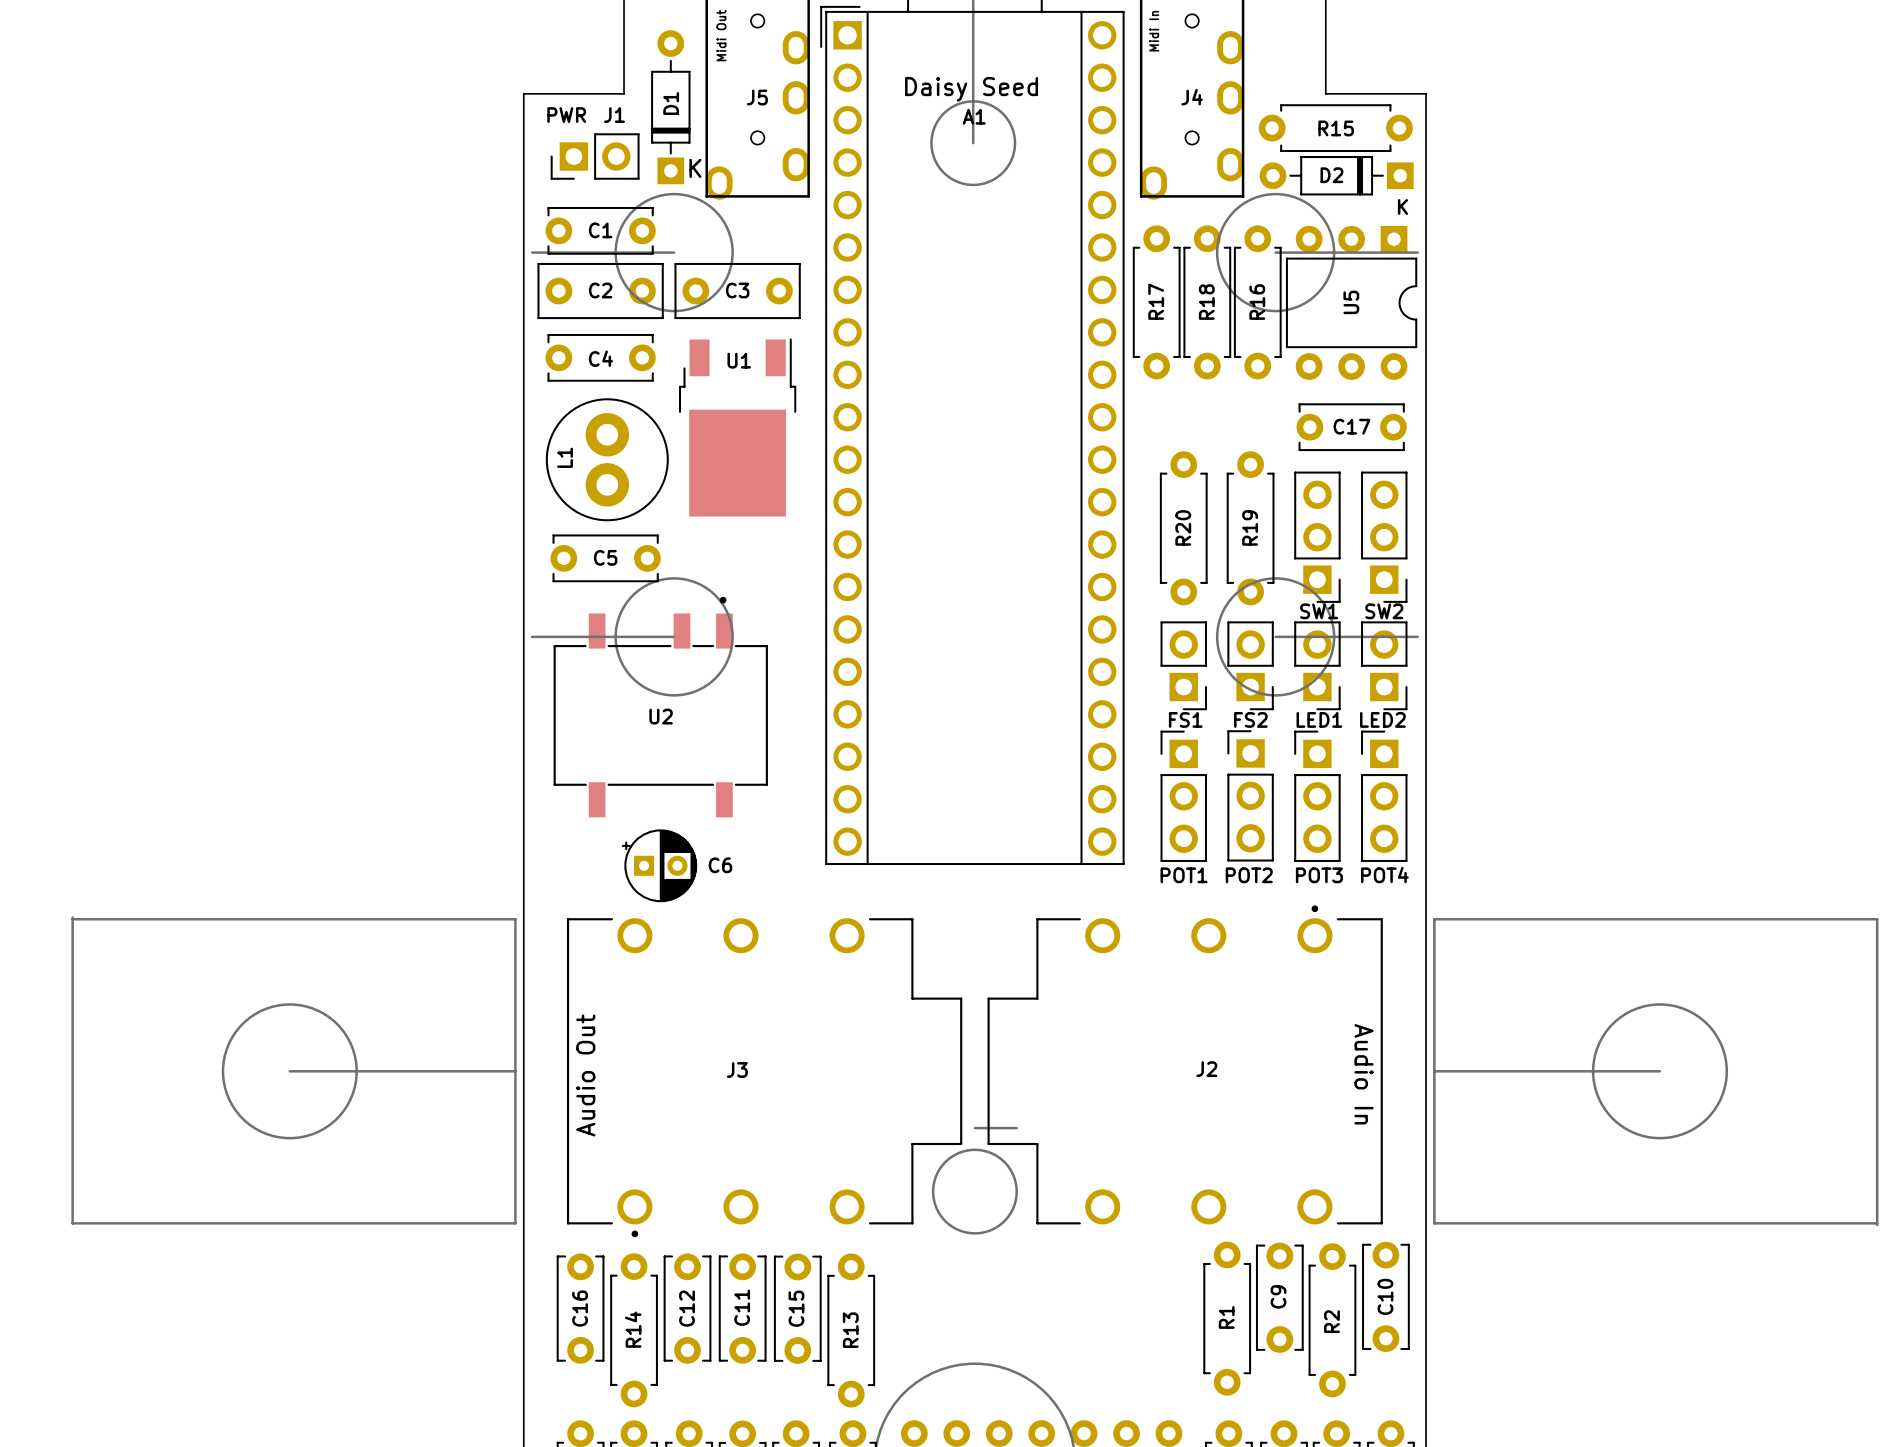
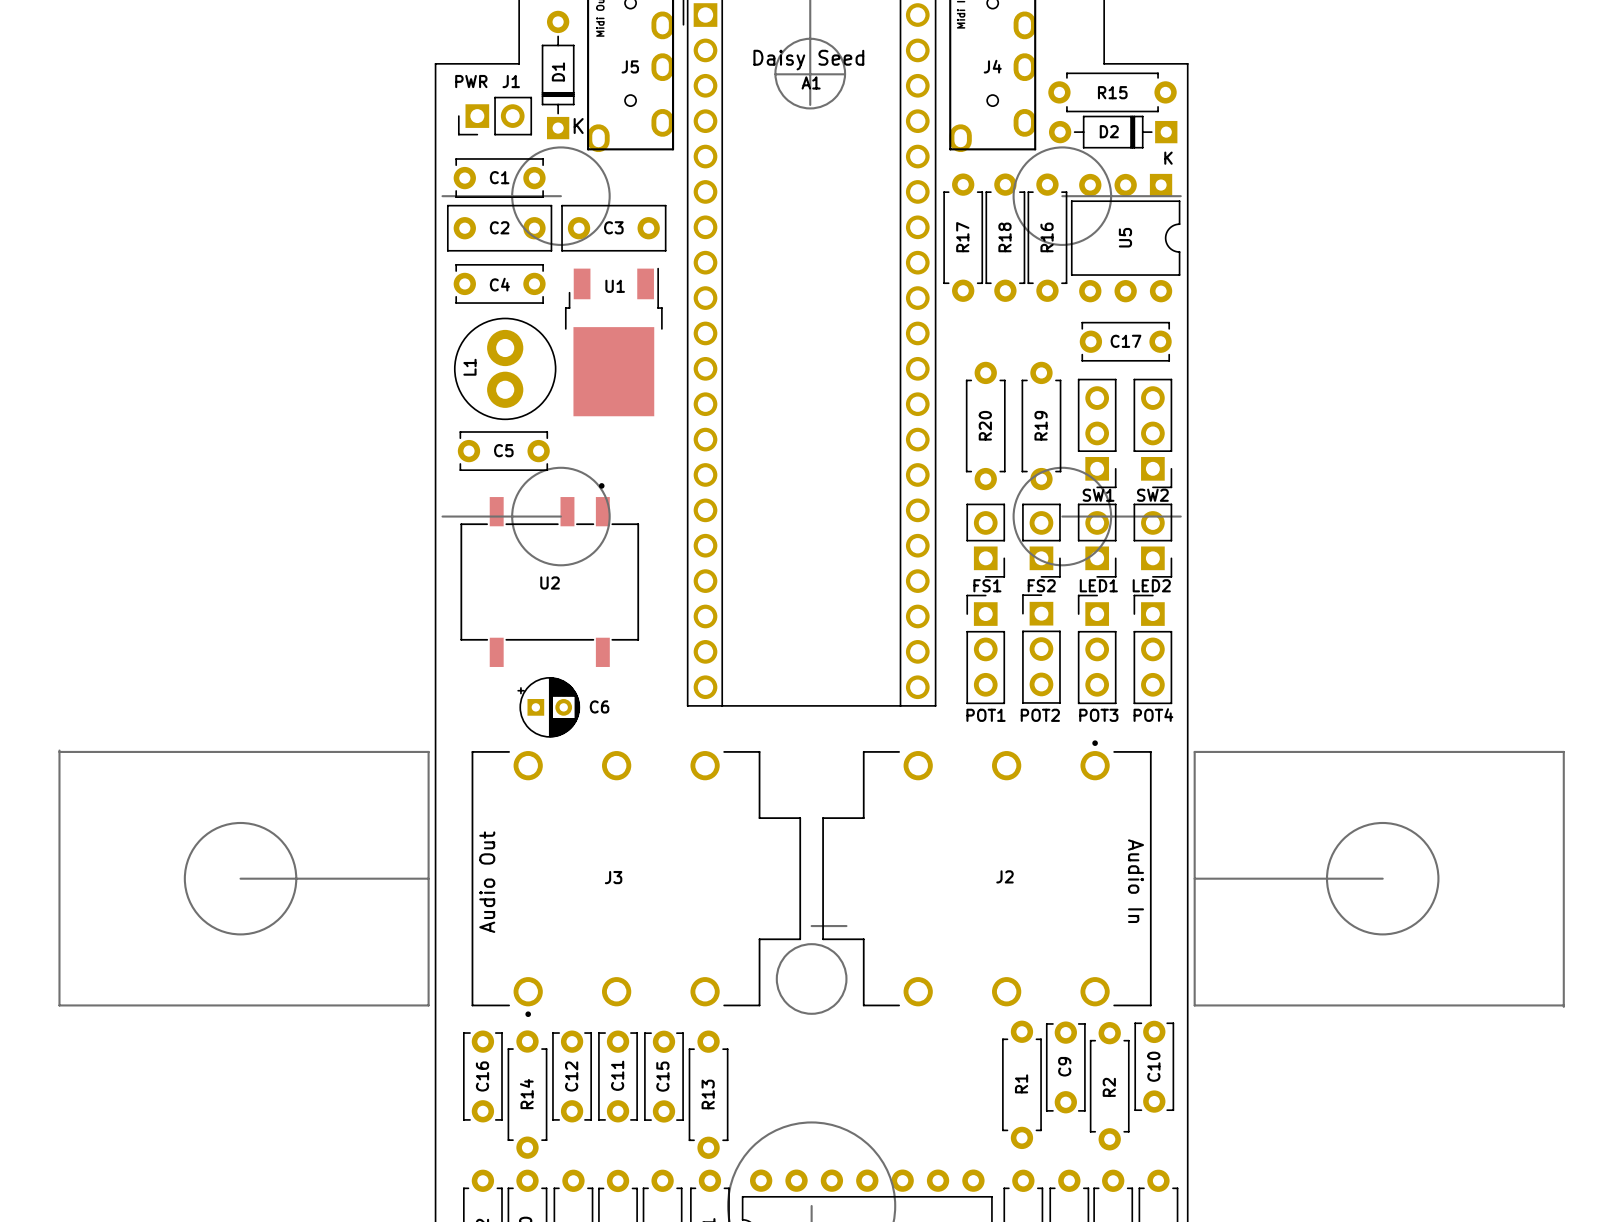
line: none -> (775, 74) (845, 74)
drawing position: (973, 143) -> (810, 73)

